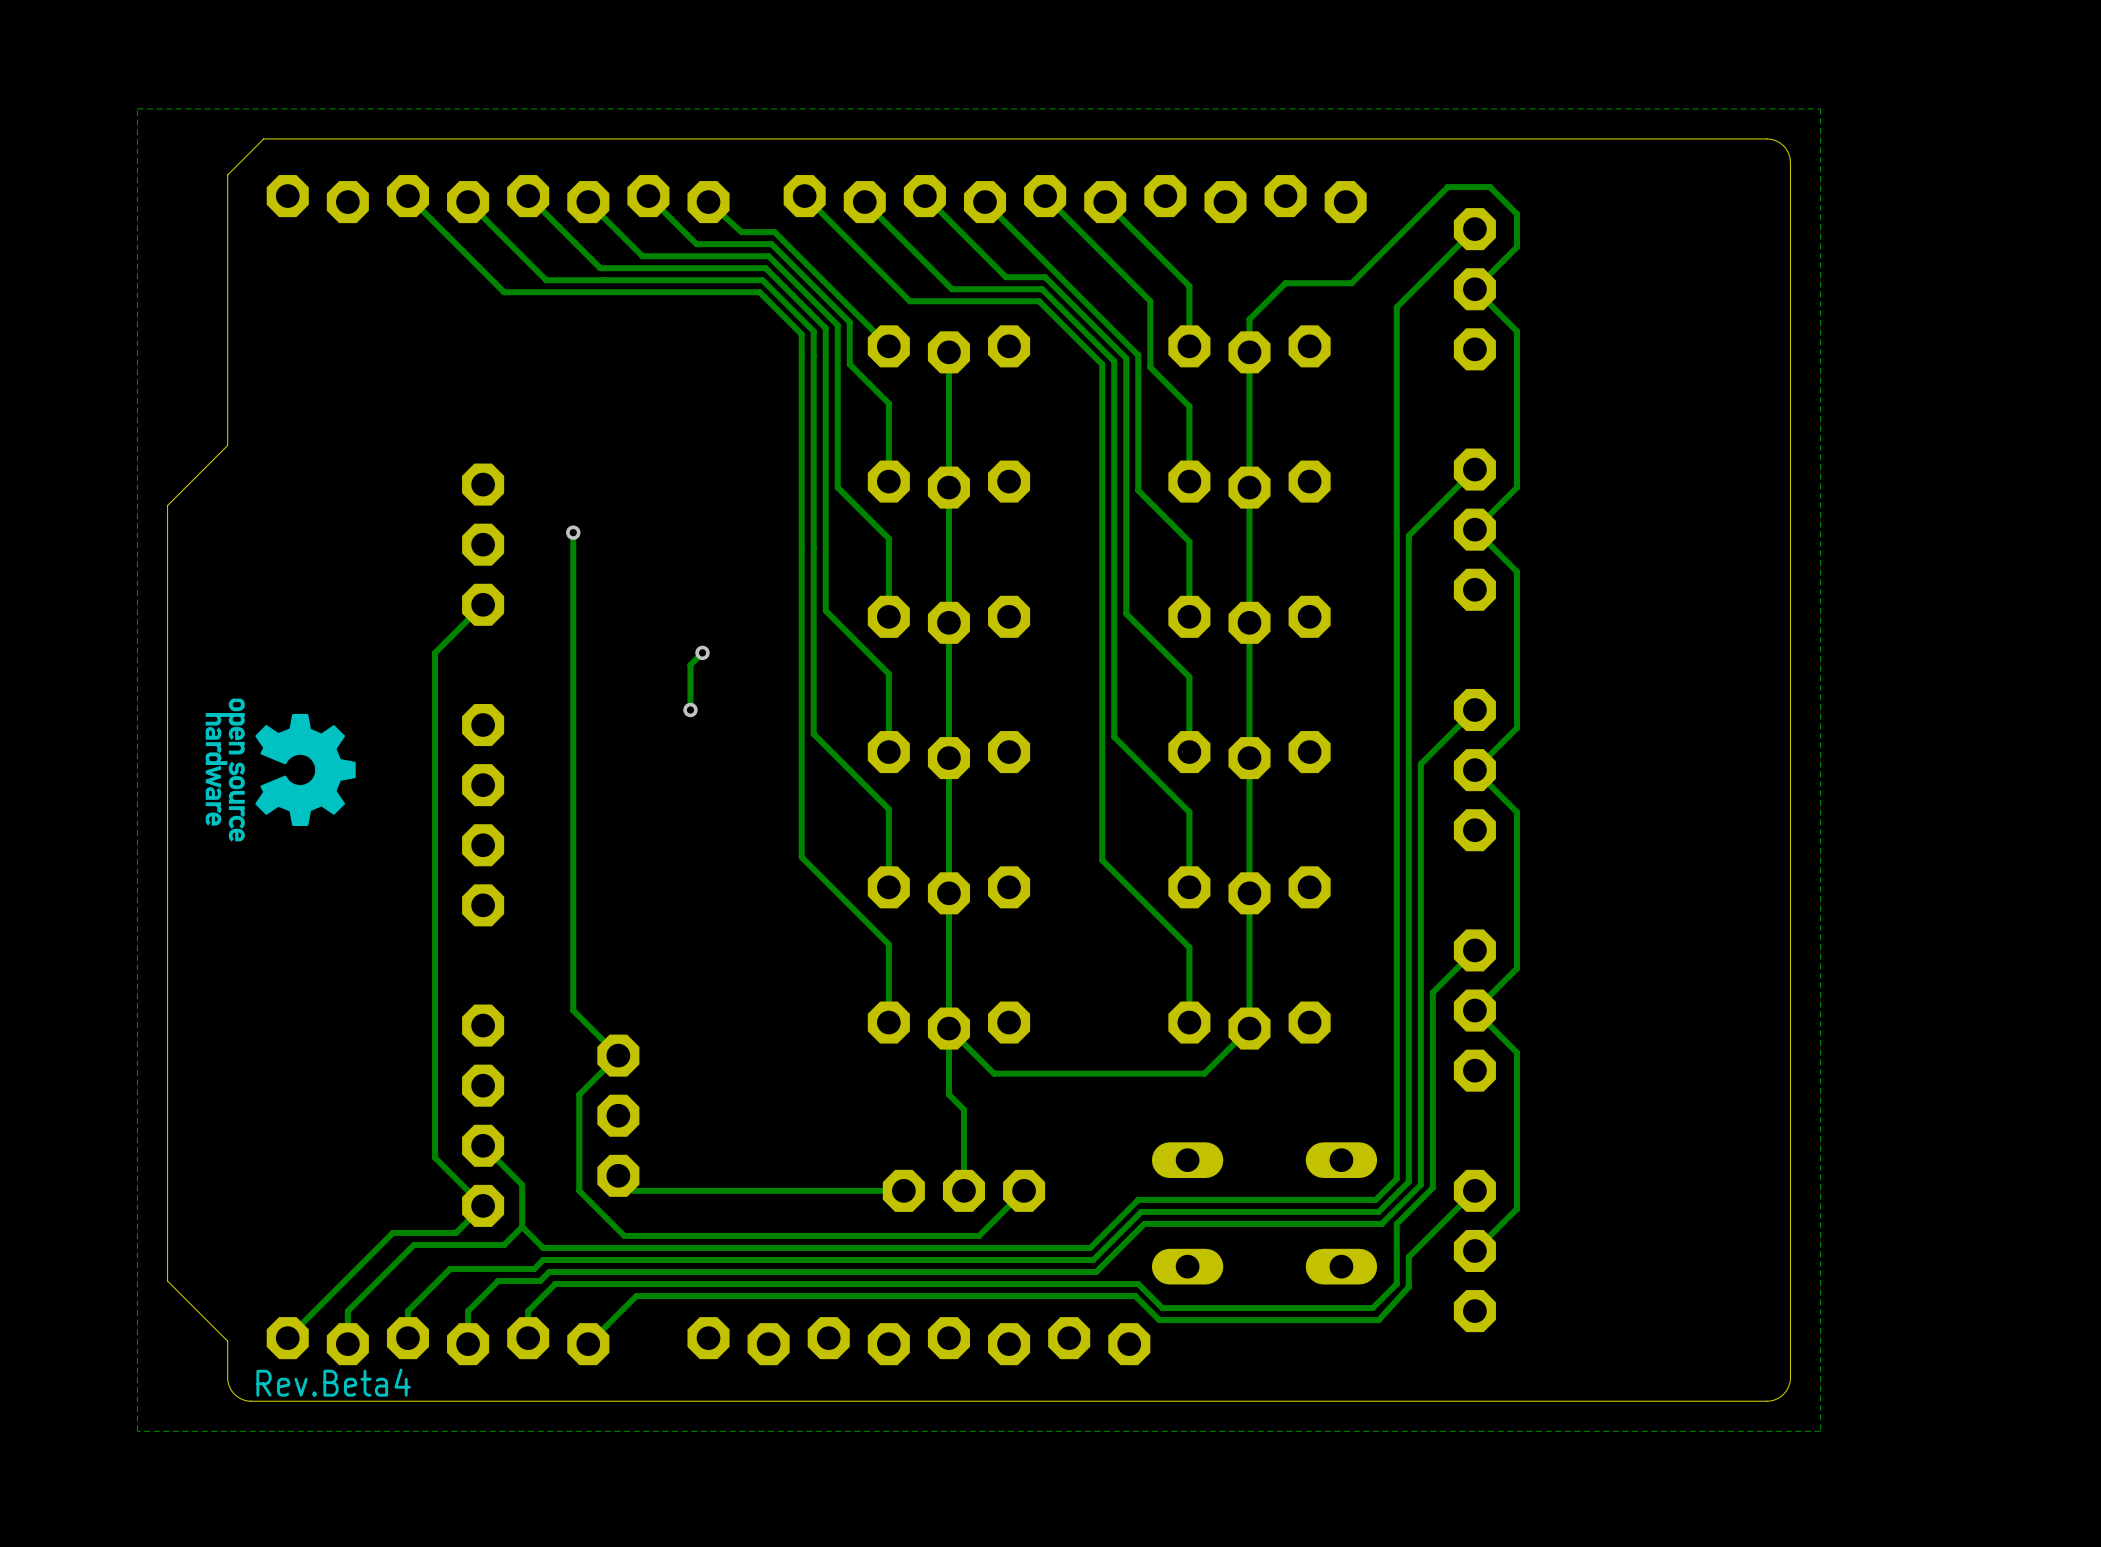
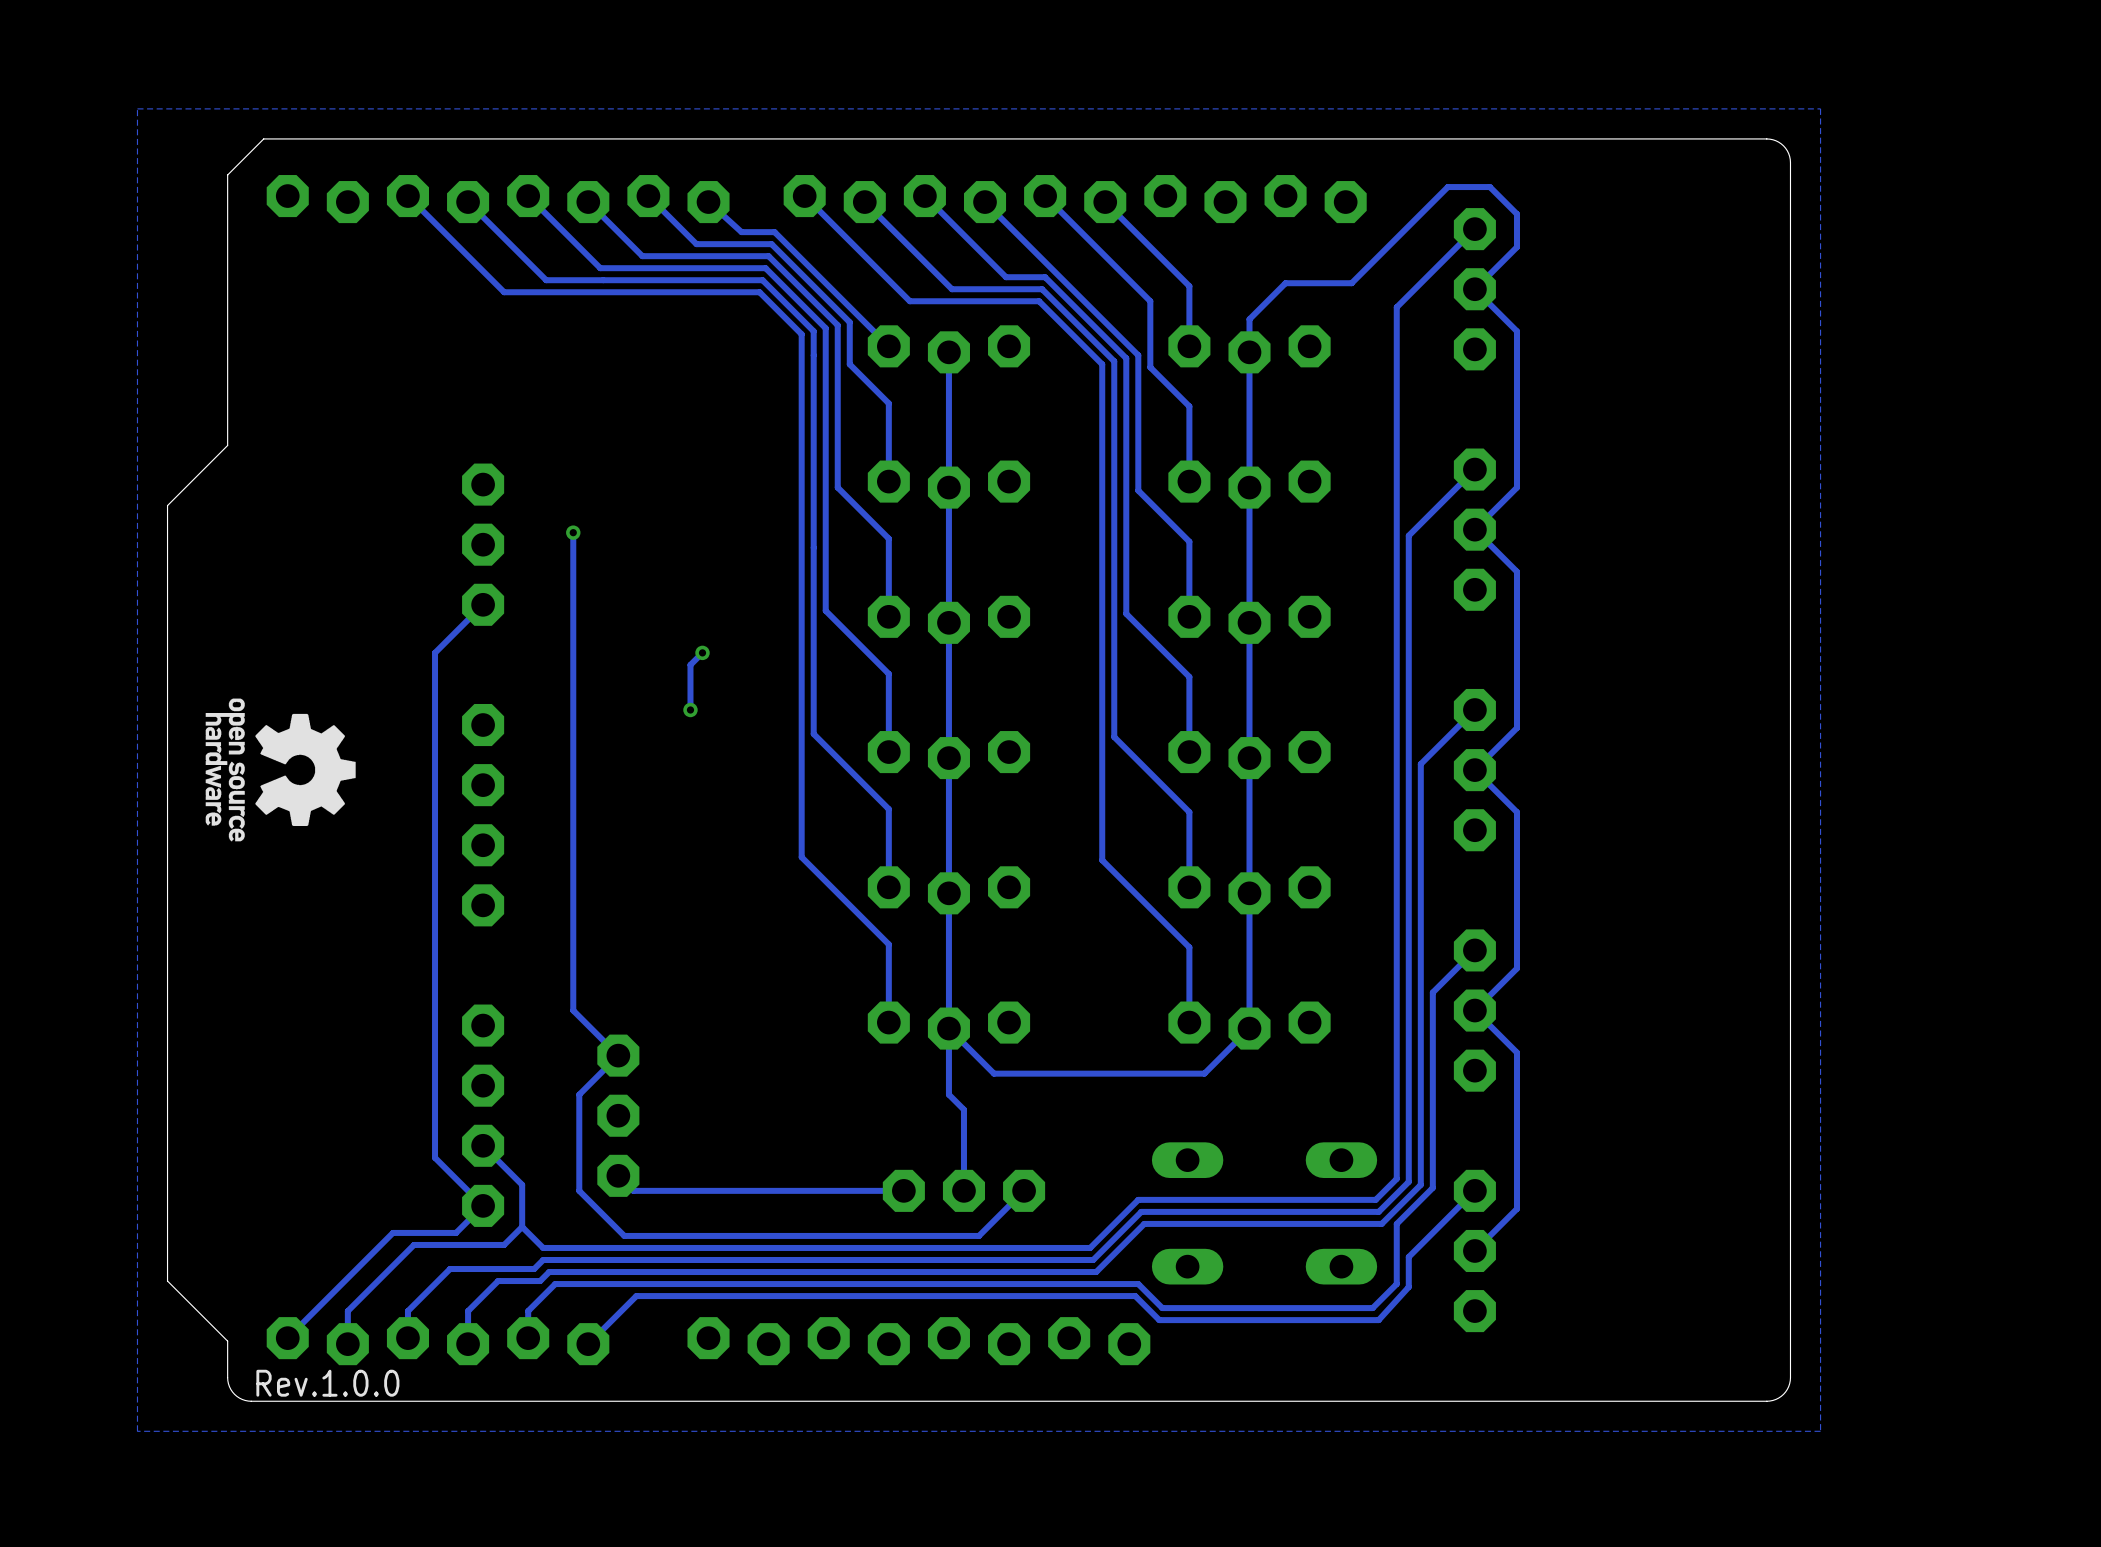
text: Rev.Beta4 (333, 1382) -> Rev.1.0.0 (327, 1383)

